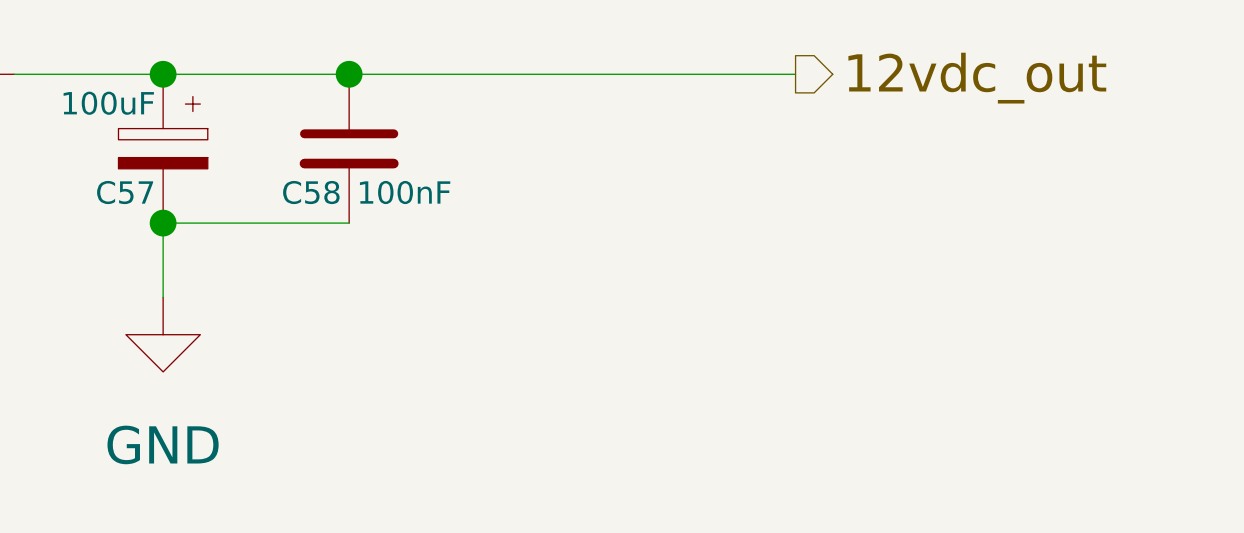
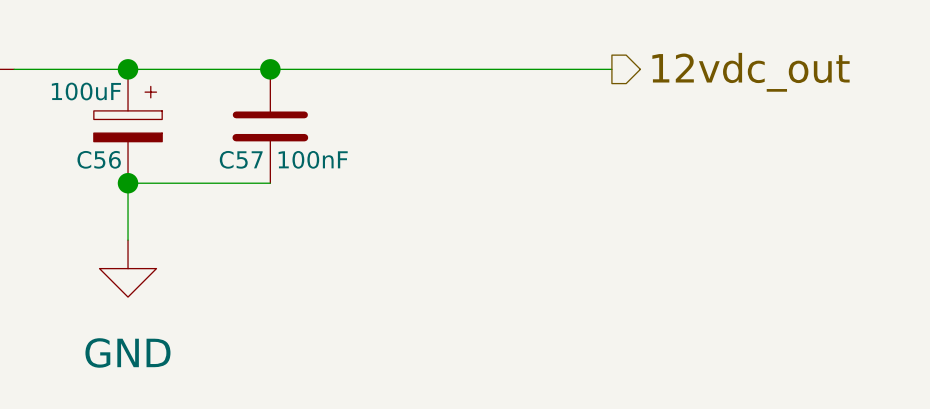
C57 name: C57 (125, 192) -> C56 (99, 159)
C58 name: C58 (311, 192) -> C57 (241, 159)

